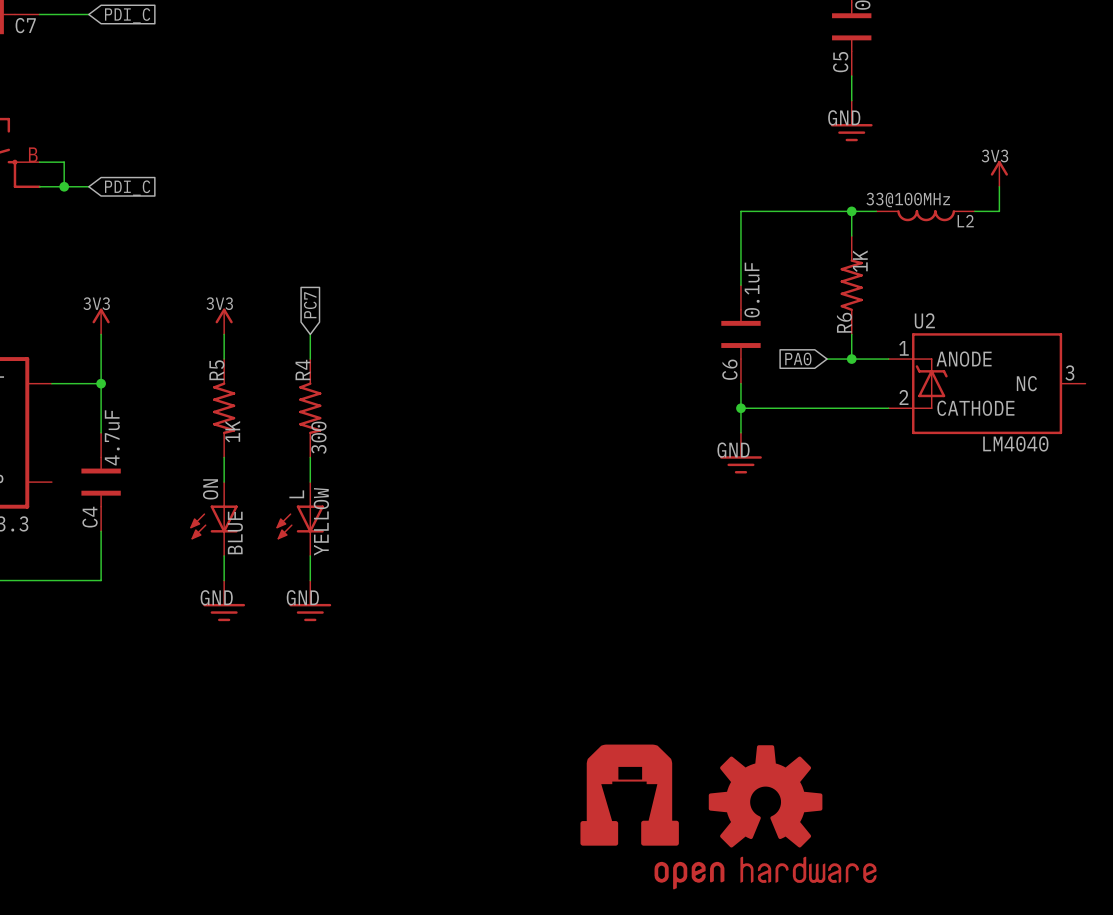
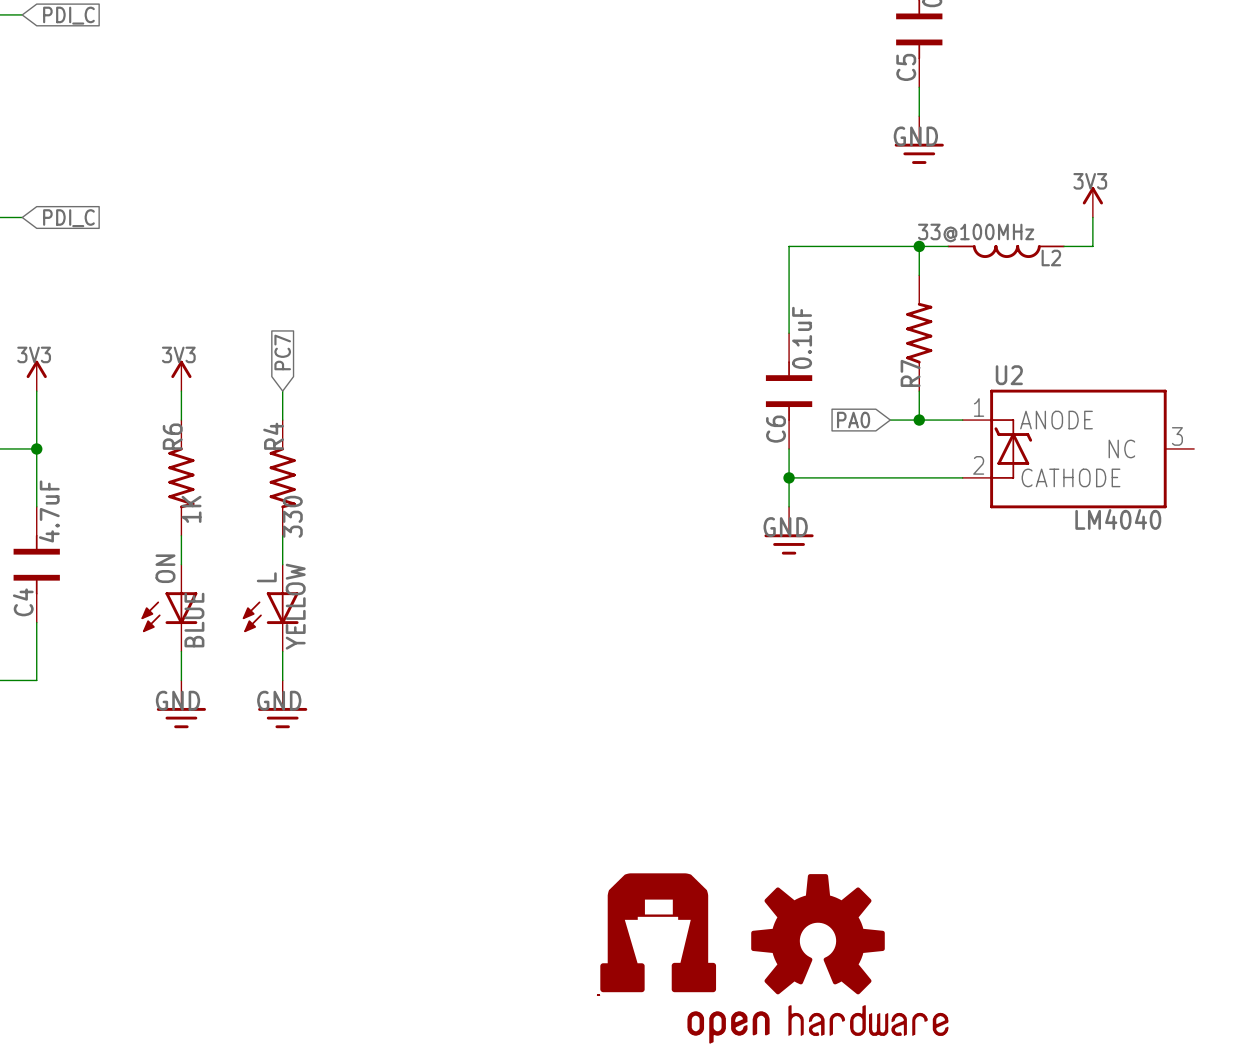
R6 value: 1K (860, 261) -> none
R6 name: R6 (844, 322) -> R7 (910, 373)
R5 name: R5 (216, 370) -> R6 (172, 436)
R4 value: 300 (318, 437) -> 330 (292, 516)

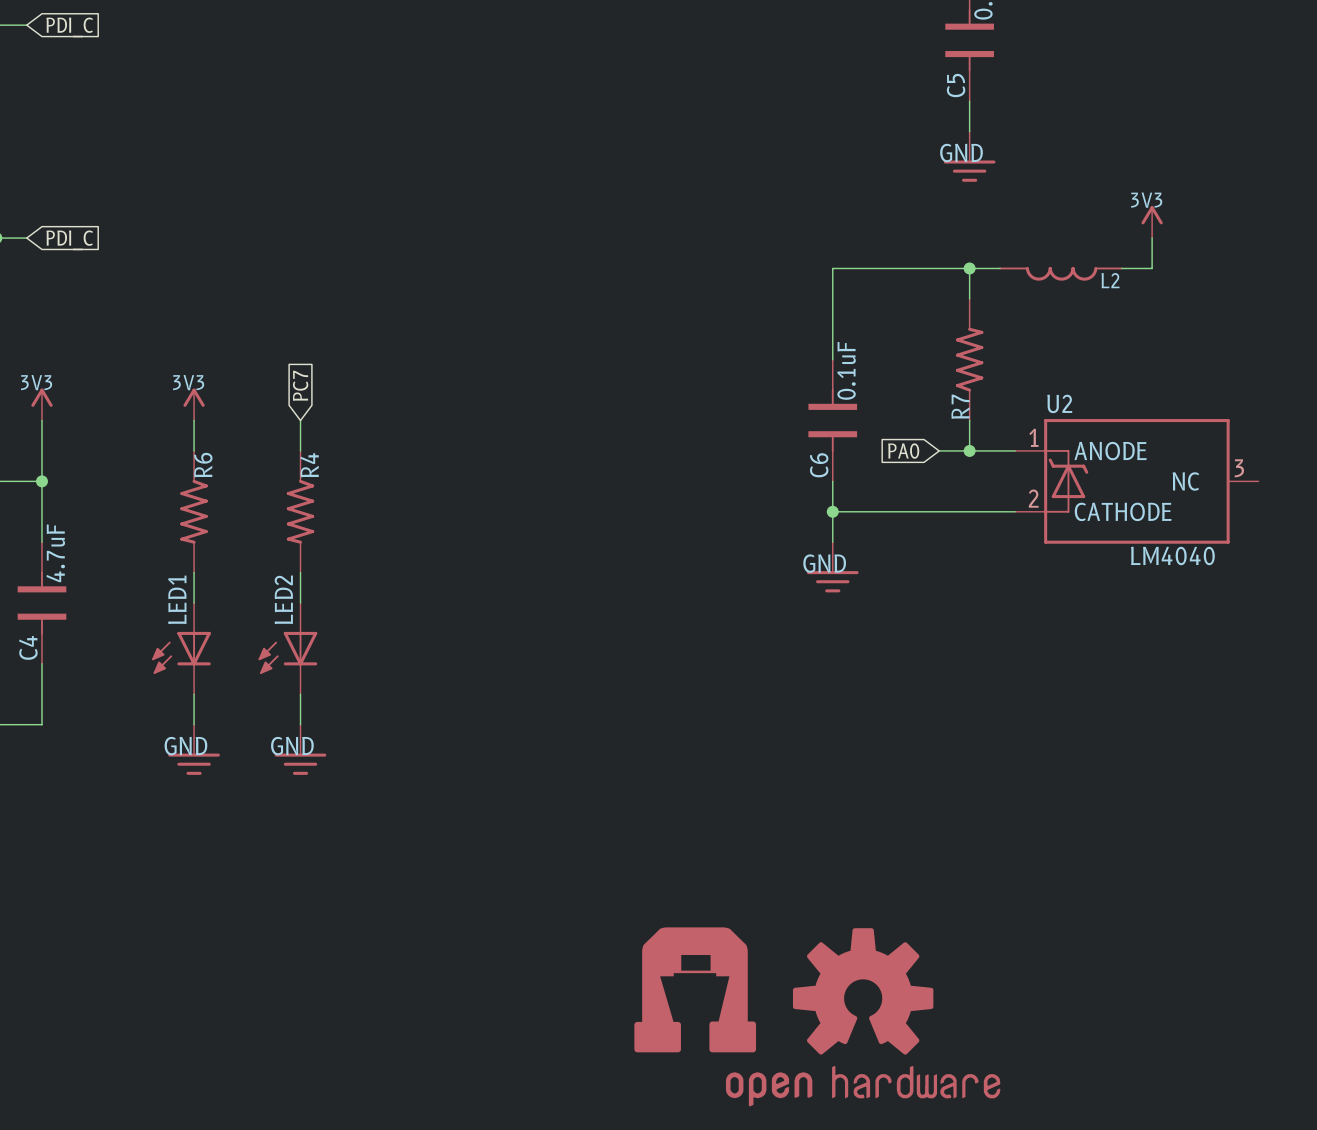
L2 value: 33@100MHz (976, 232) -> none
R6 flip: as is (181, 477) -> left-right (194, 511)
R4 flip: as is (282, 477) -> left-right (300, 511)
R6 value: 1K (191, 509) -> none
R4 value: 330 (292, 516) -> none
ON name: ON (165, 568) -> LED1 (177, 599)
L name: L (266, 577) -> LED2 (283, 599)
L value: YELLOW (295, 606) -> none
ON value: BLUE (194, 620) -> none

